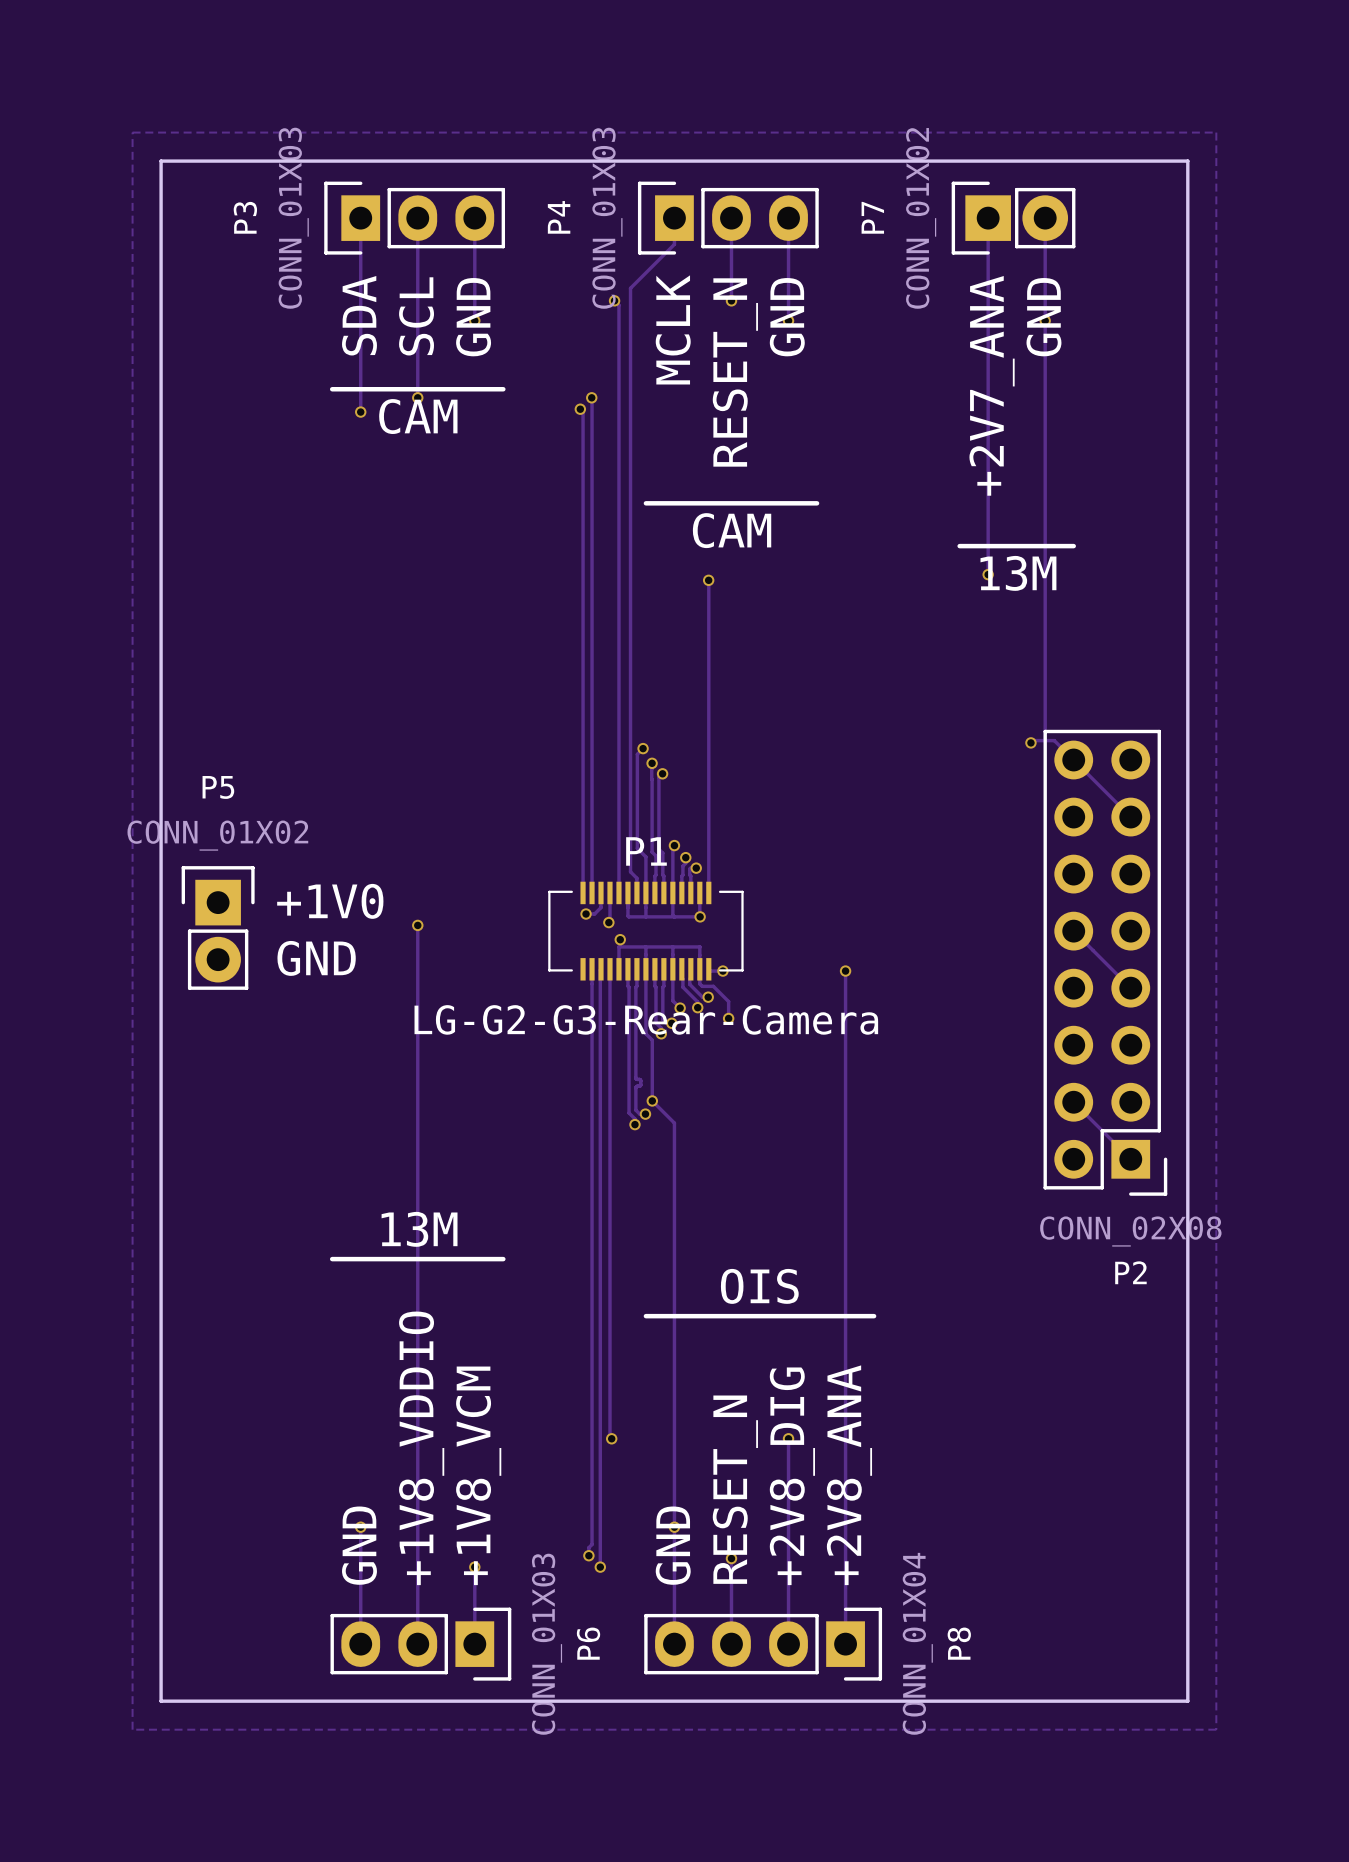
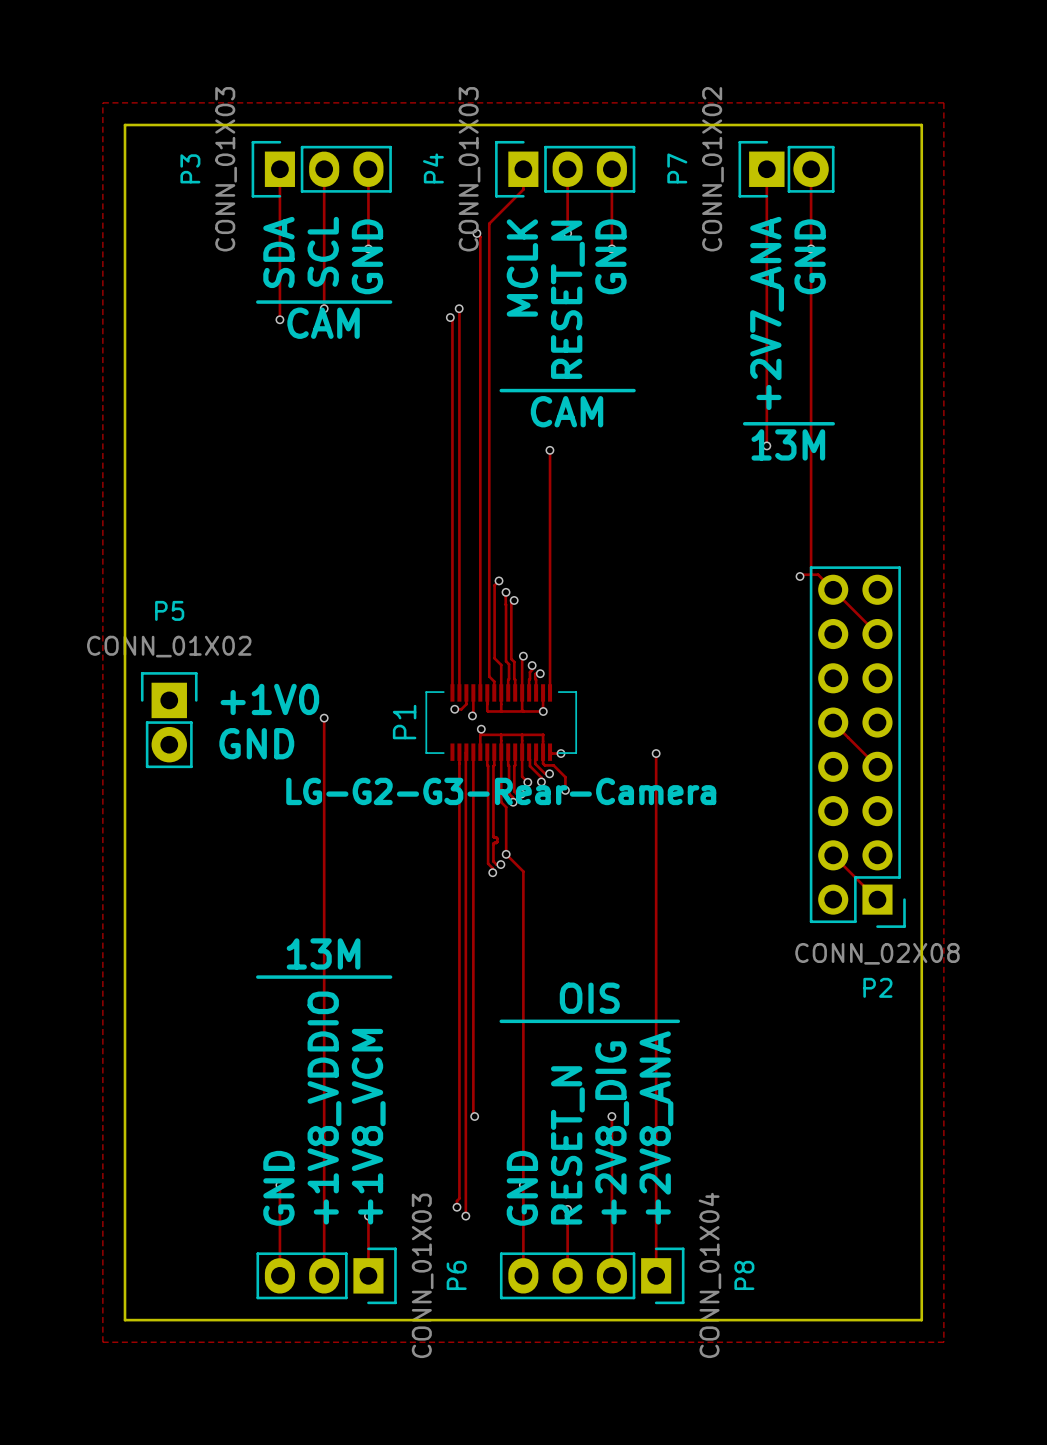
P1 name rotation: 0° (646, 851) -> 90° counterclockwise (404, 722)
P1 name position: P1 (646, 851) -> P1 (404, 722)

